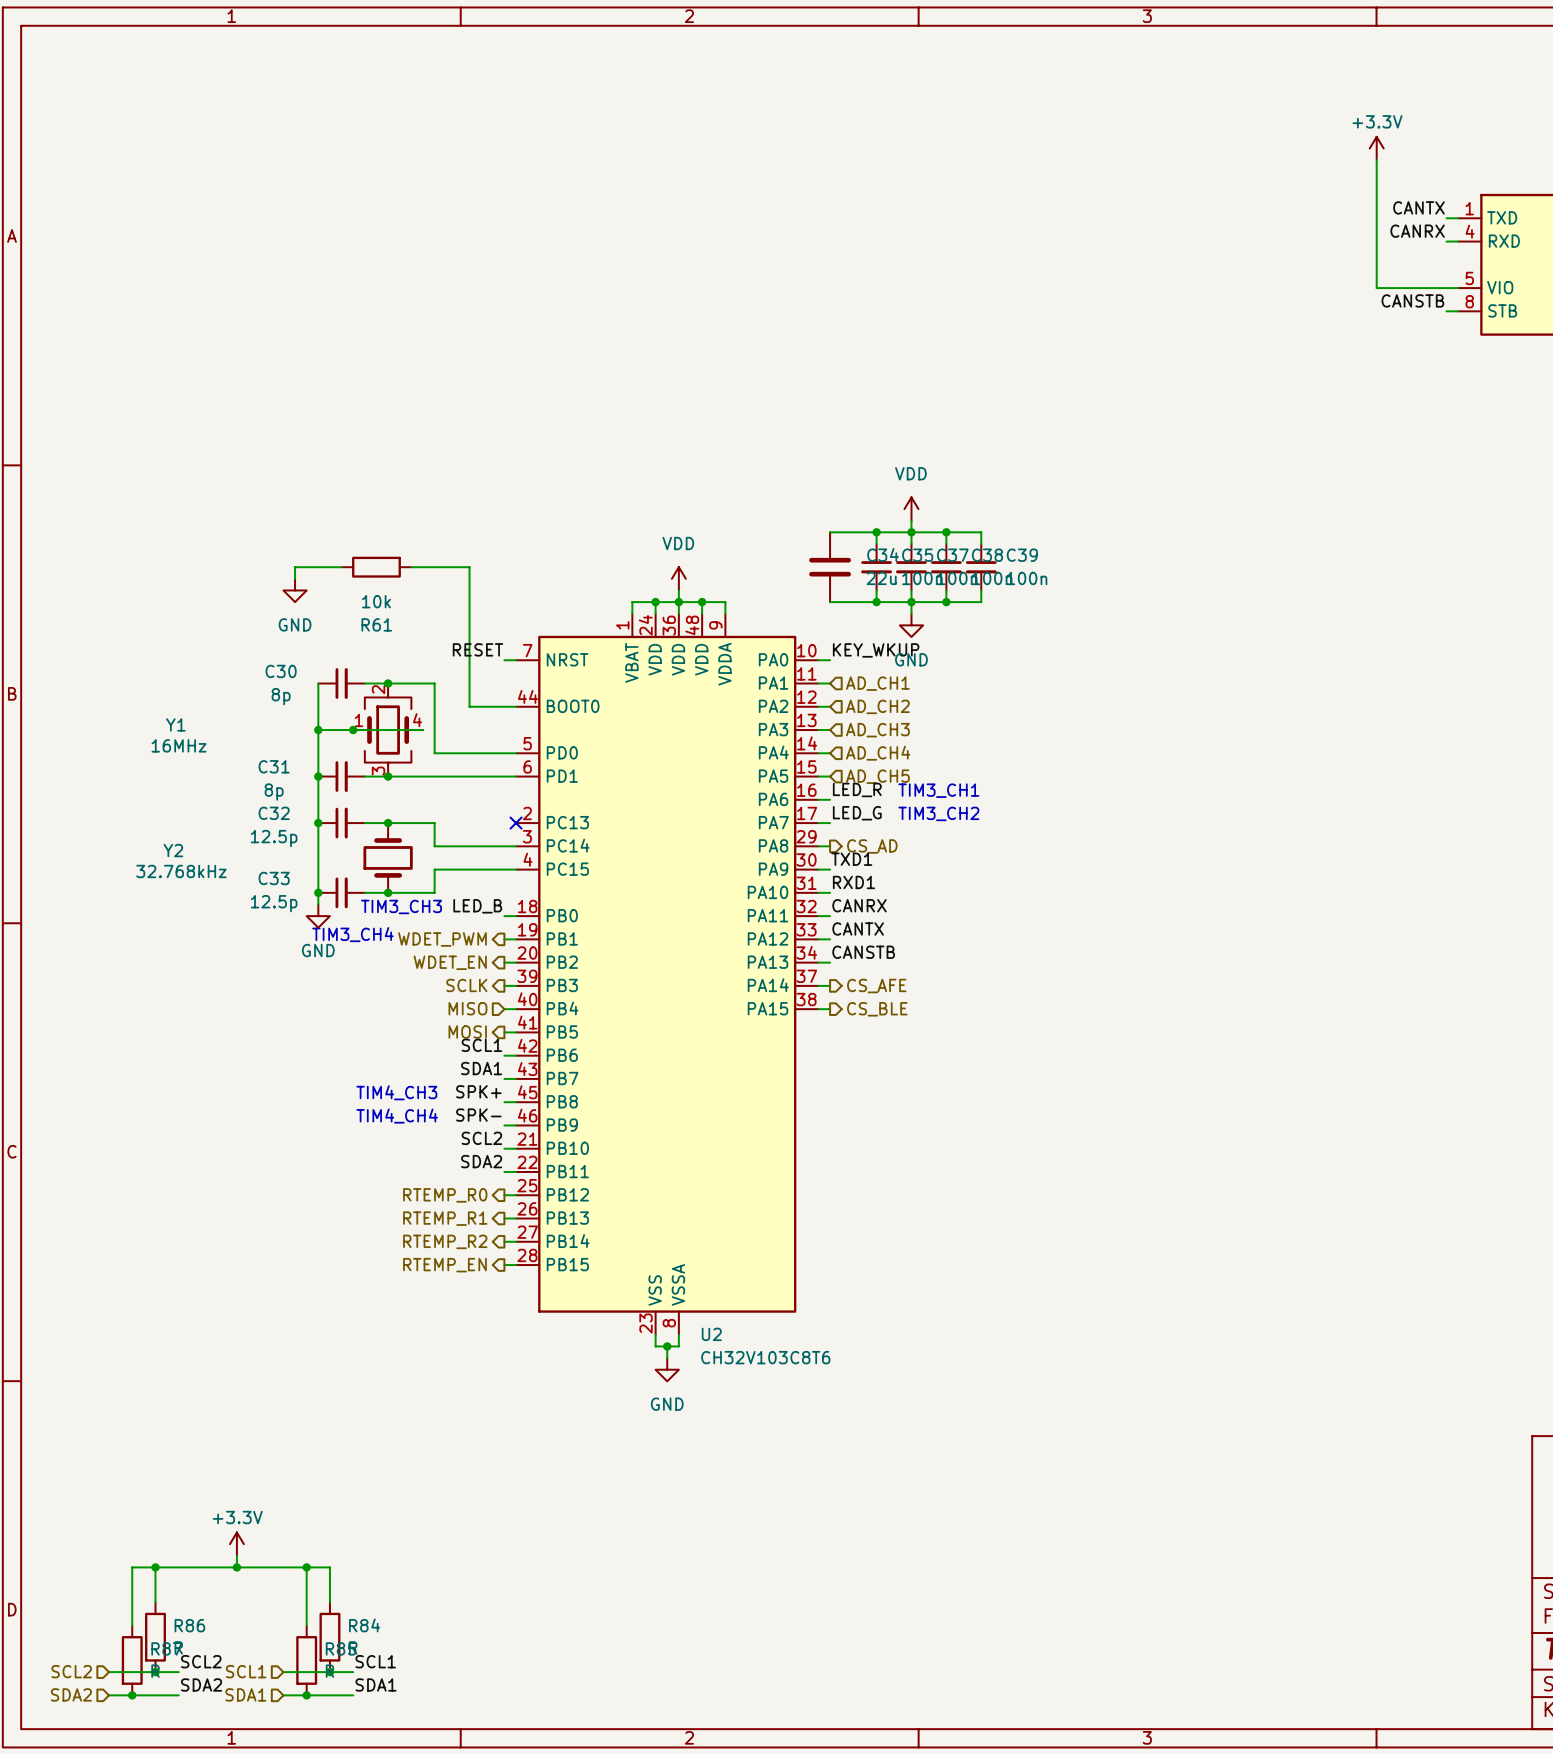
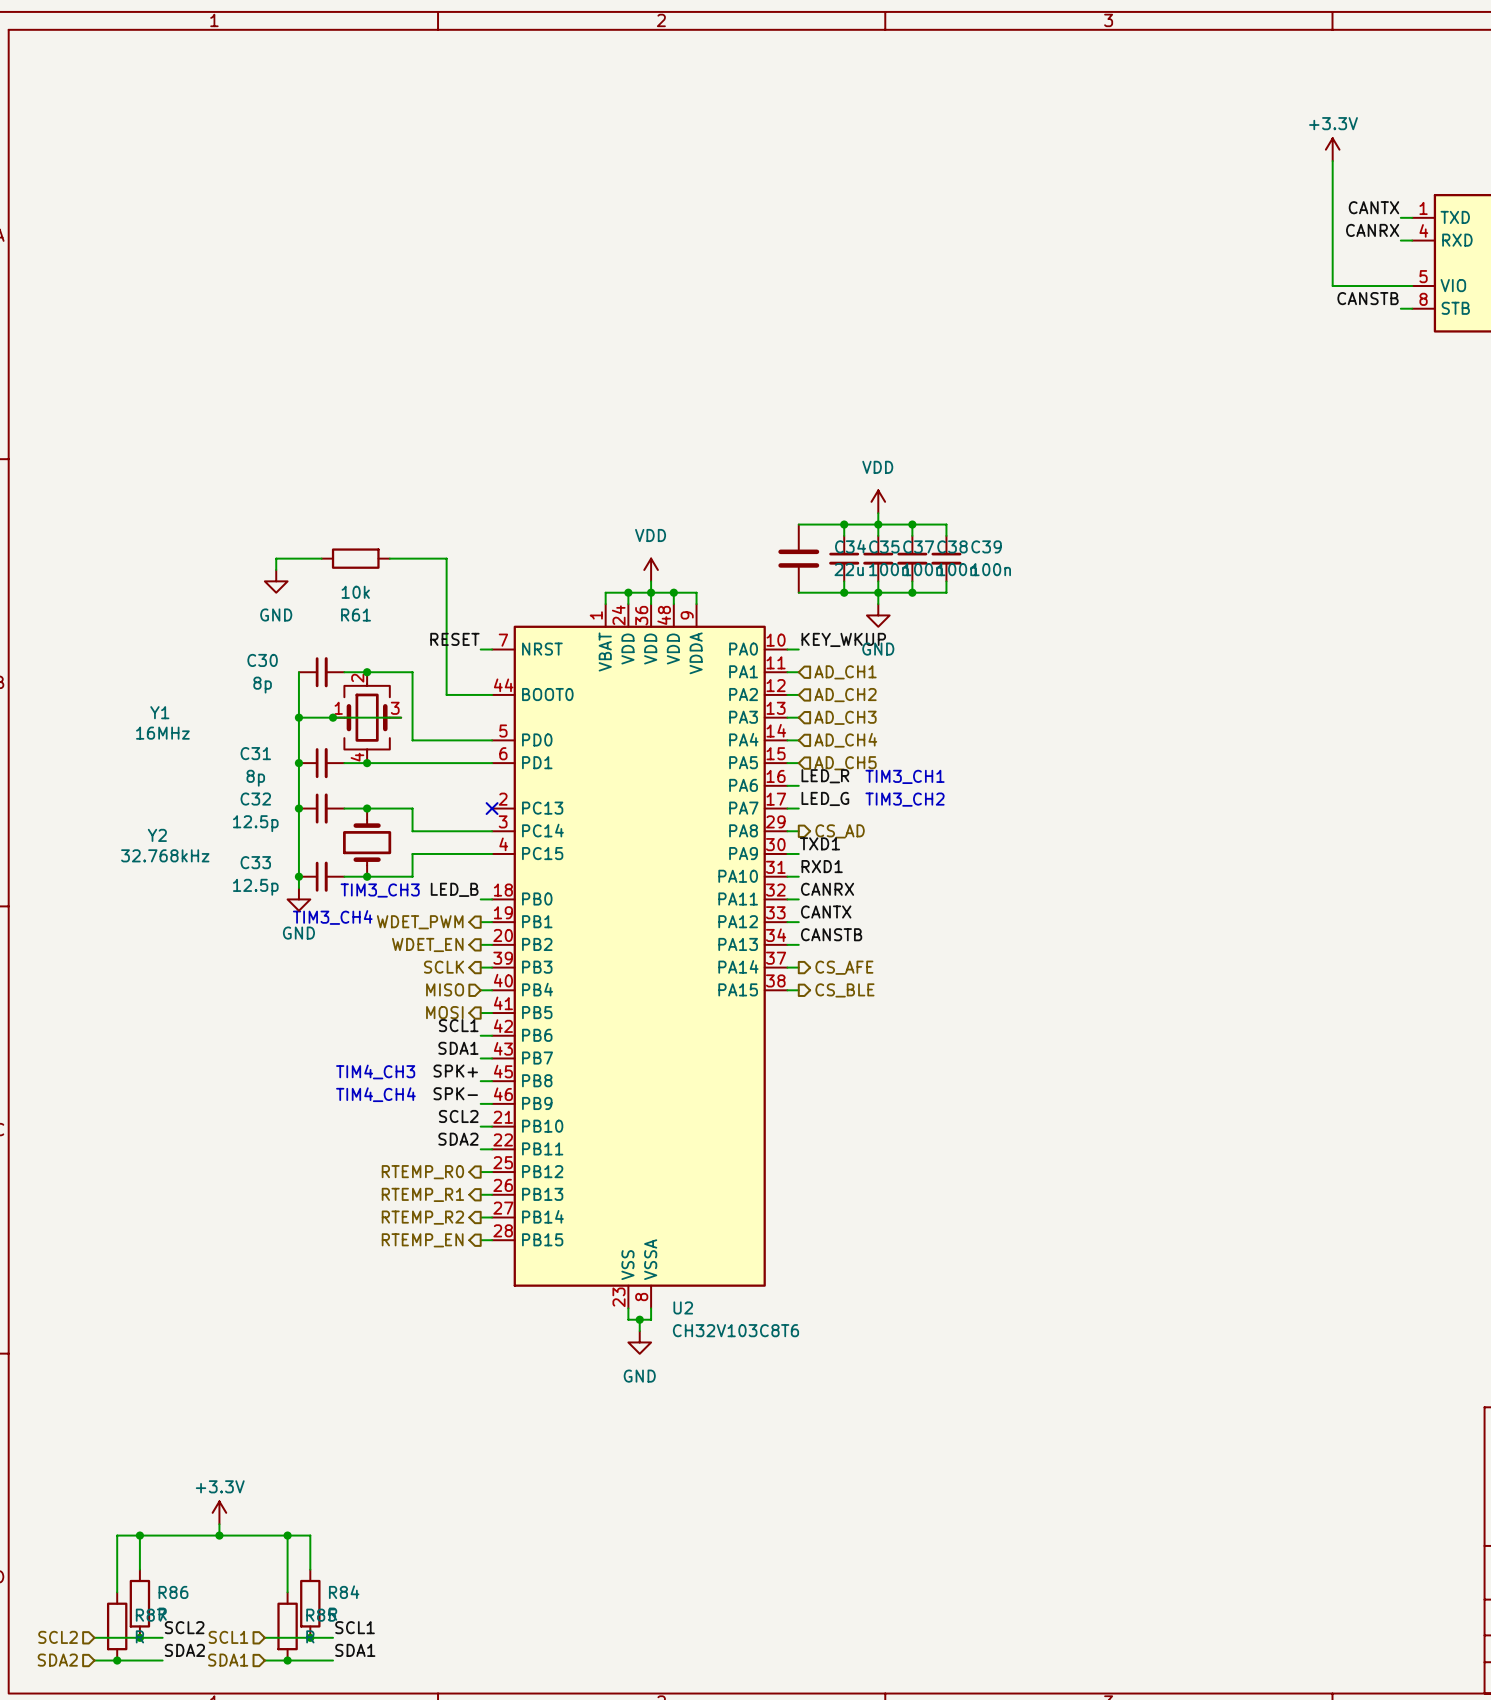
Y1 pin number: 4 (417, 720) -> 3 (395, 708)
Y1 pin number: 3 (378, 771) -> 4 (357, 757)

